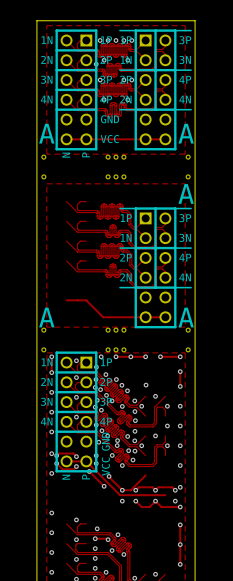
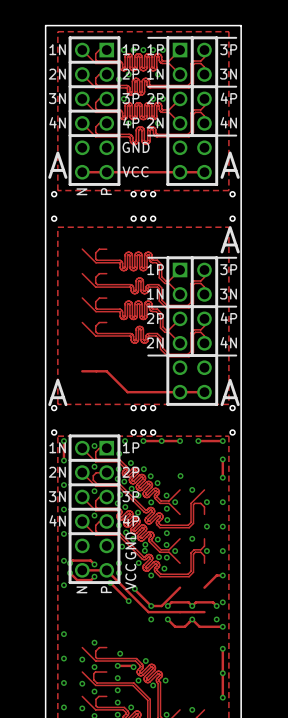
via: none -> (138, 512)
track: none -> (222, 575) (216, 575) (204, 587)
via: none -> (82, 659)
via: none -> (165, 680)
via: none -> (82, 683)
via: none -> (82, 708)

